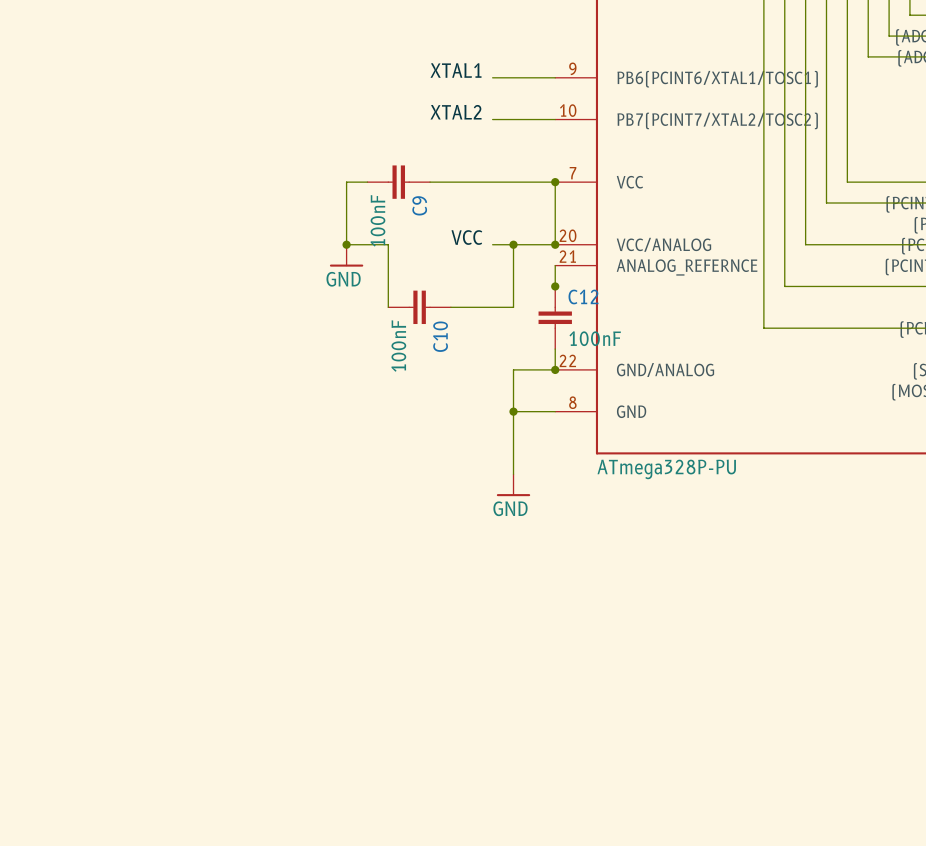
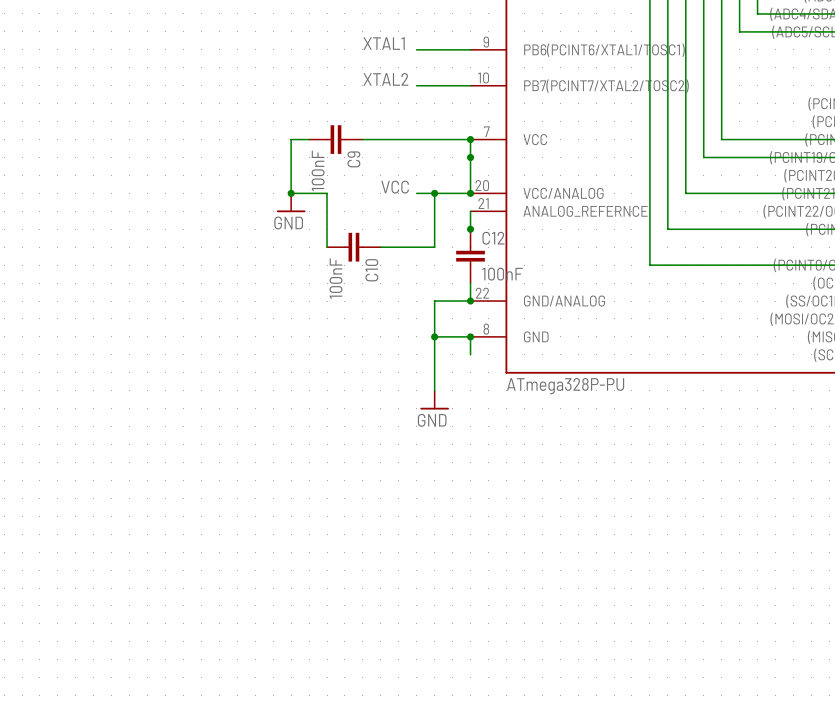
junction: none -> (470, 157)
wire: none -> (470, 336) (470, 354)
junction: none -> (470, 336)

